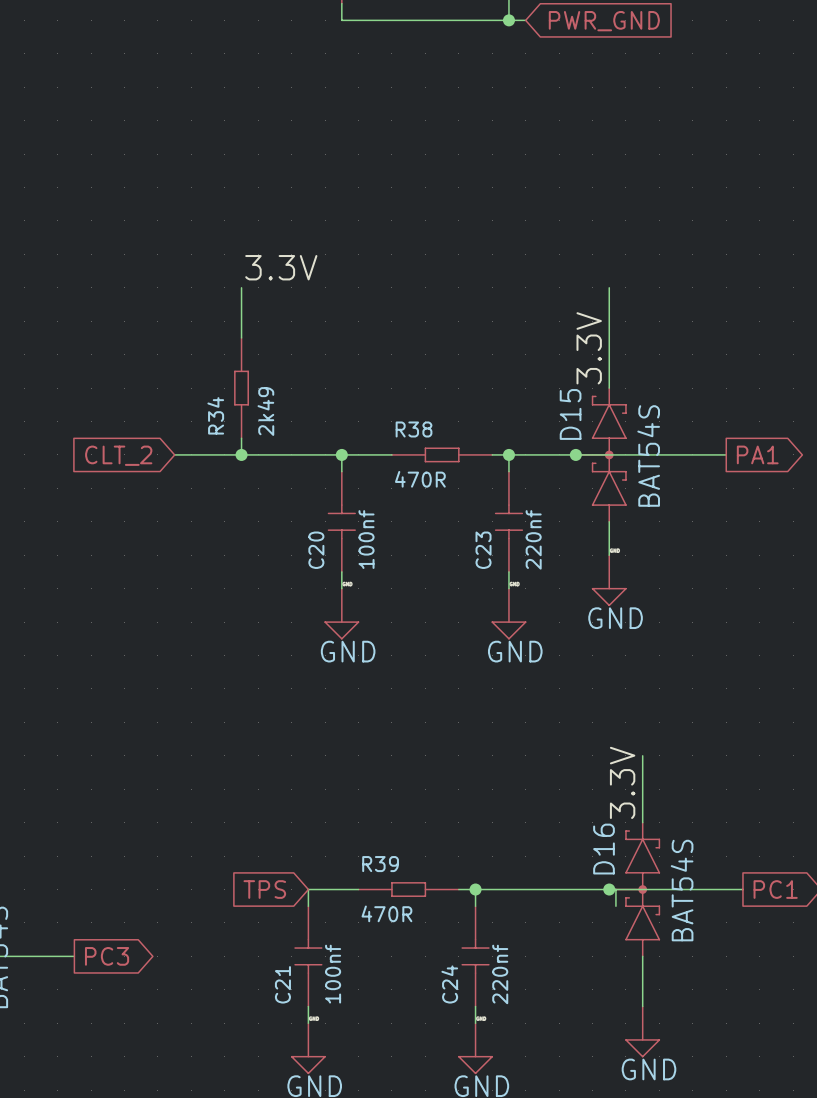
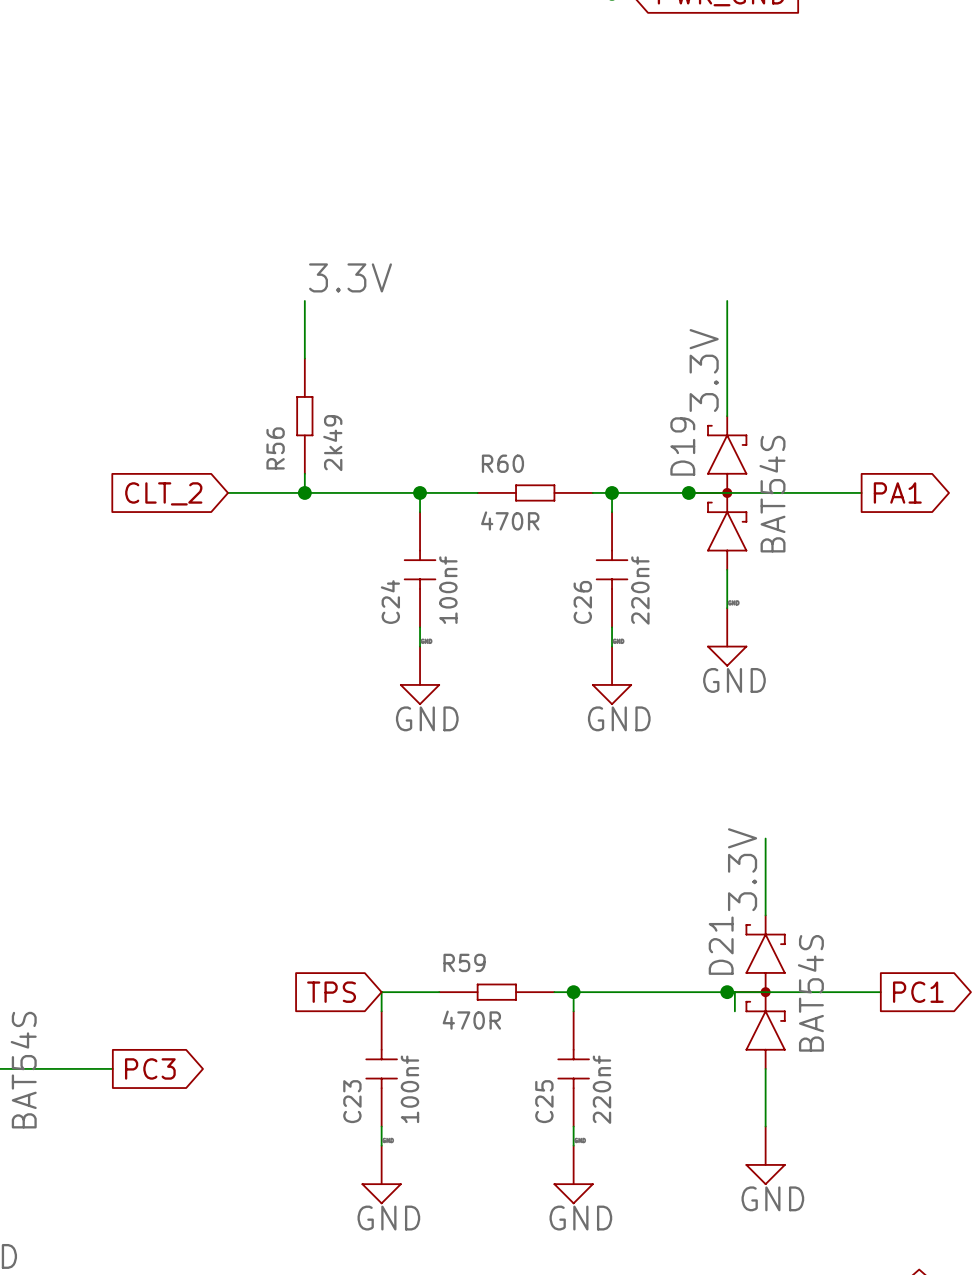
D15 name: D15 (570, 414) -> D19 (682, 446)
R34 name: R34 (215, 415) -> R56 (275, 448)
R38 name: R38 (414, 429) -> R60 (502, 463)
C20 name: C20 (316, 550) -> C24 (390, 602)
C23 name: C23 (483, 550) -> C26 (582, 602)
D16 name: D16 (604, 849) -> D21 (721, 945)
R39 name: R39 (380, 864) -> R59 (464, 962)
C21 name: C21 (282, 984) -> C23 (352, 1101)
C24 name: C24 (449, 984) -> C25 (544, 1101)

